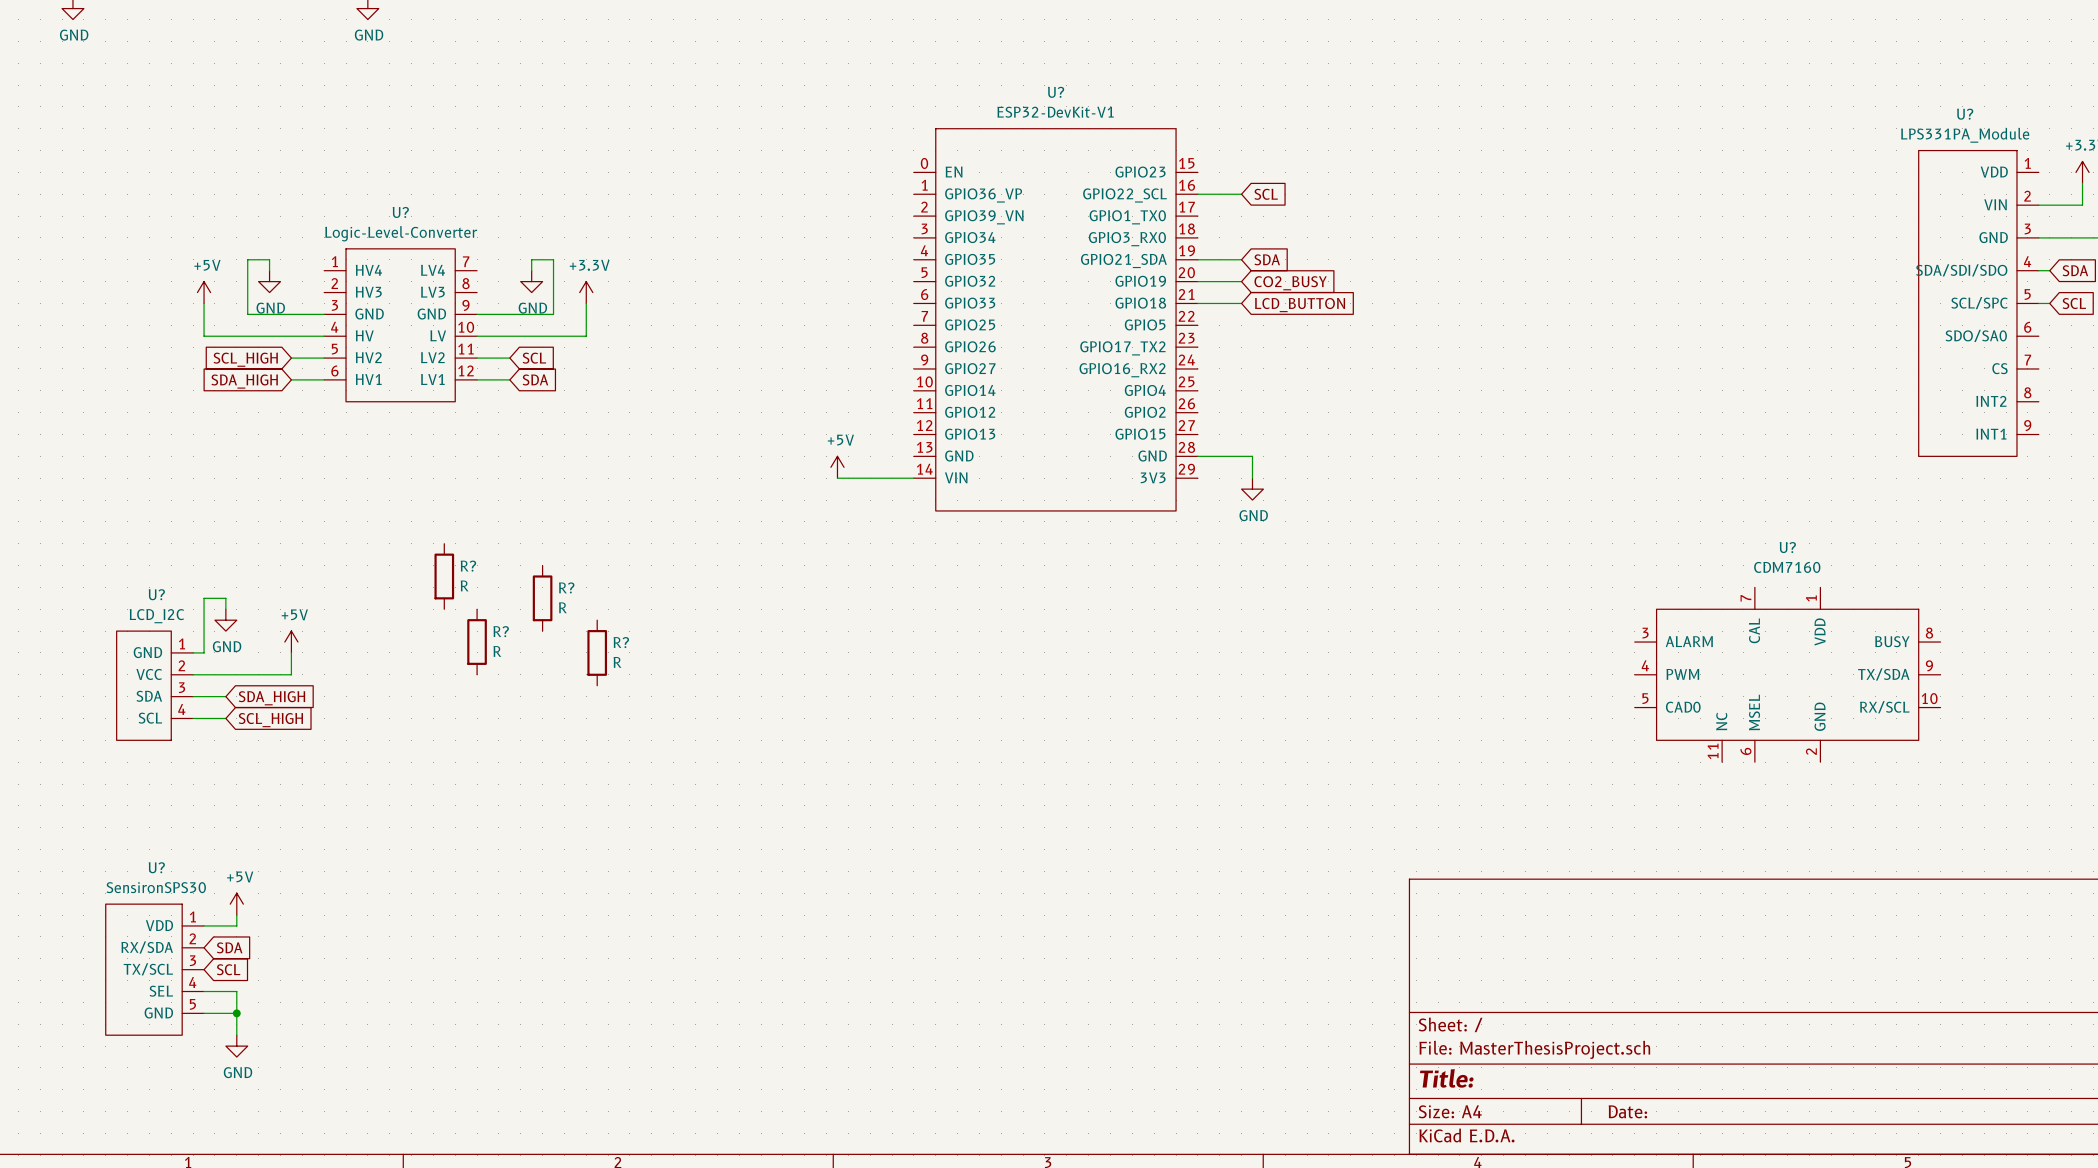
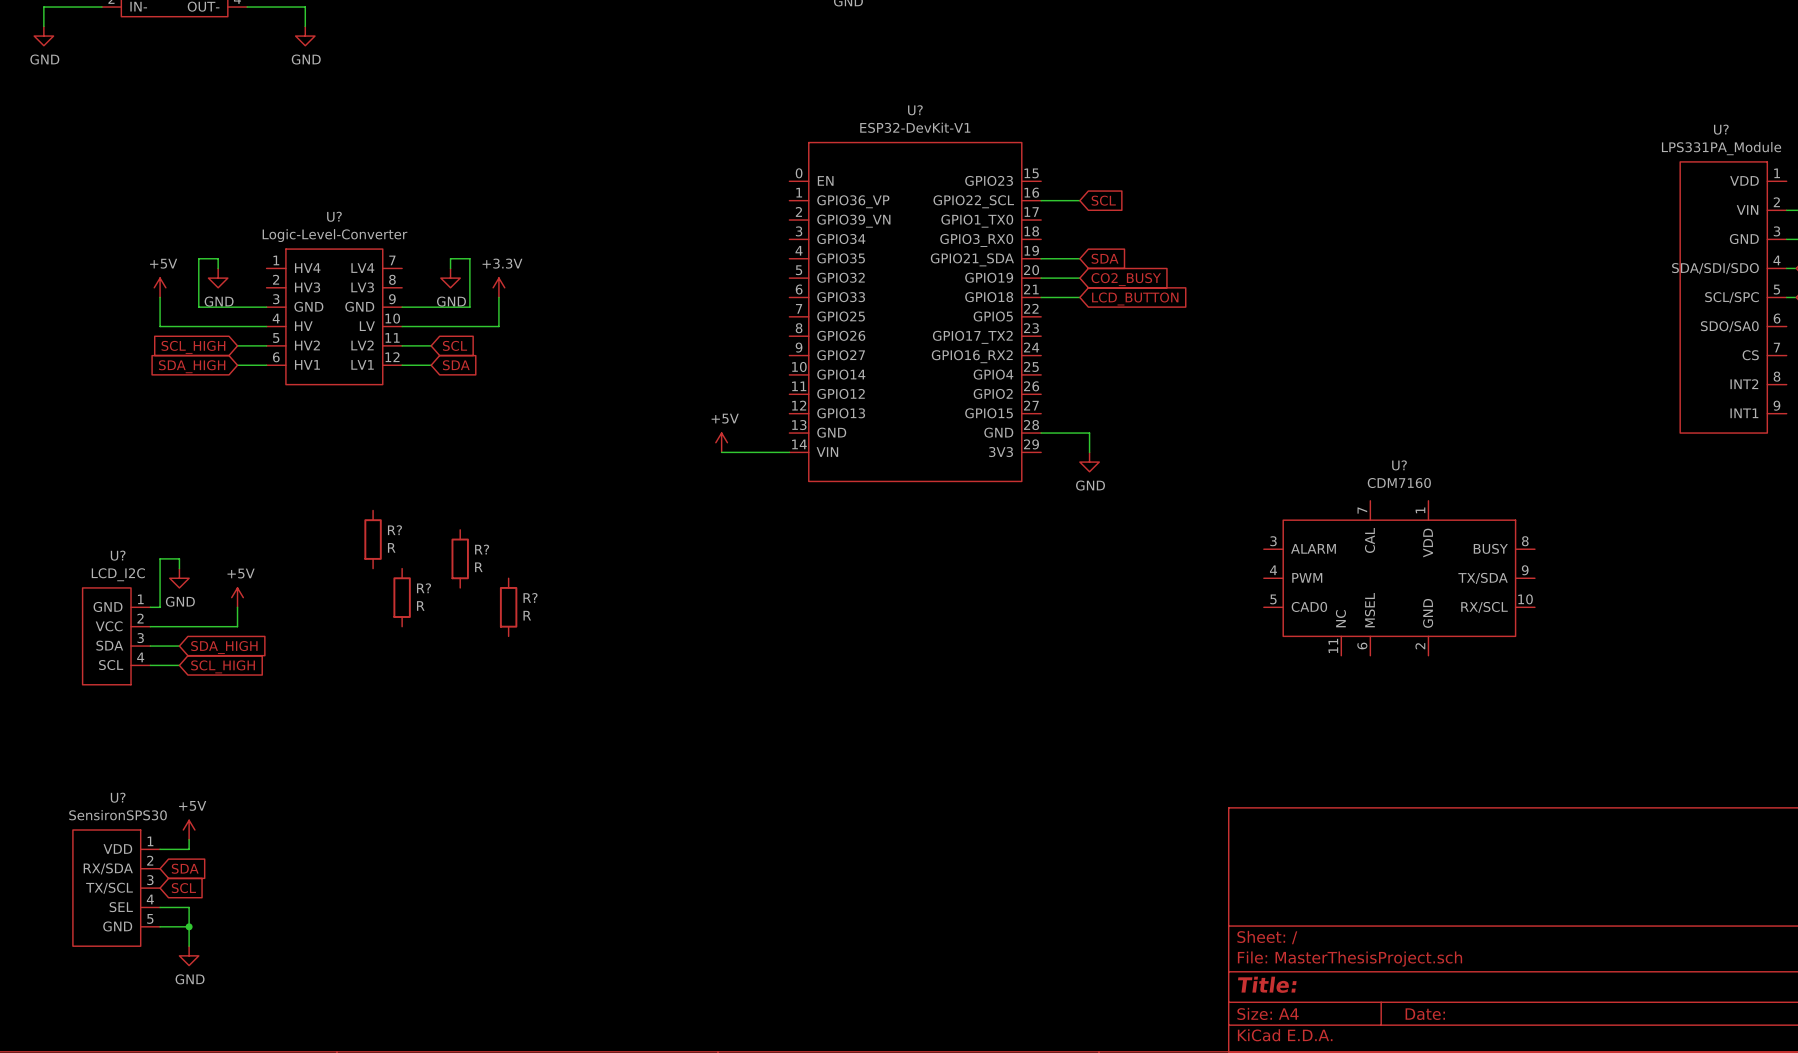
U? position: (1787, 674) -> (1399, 578)

